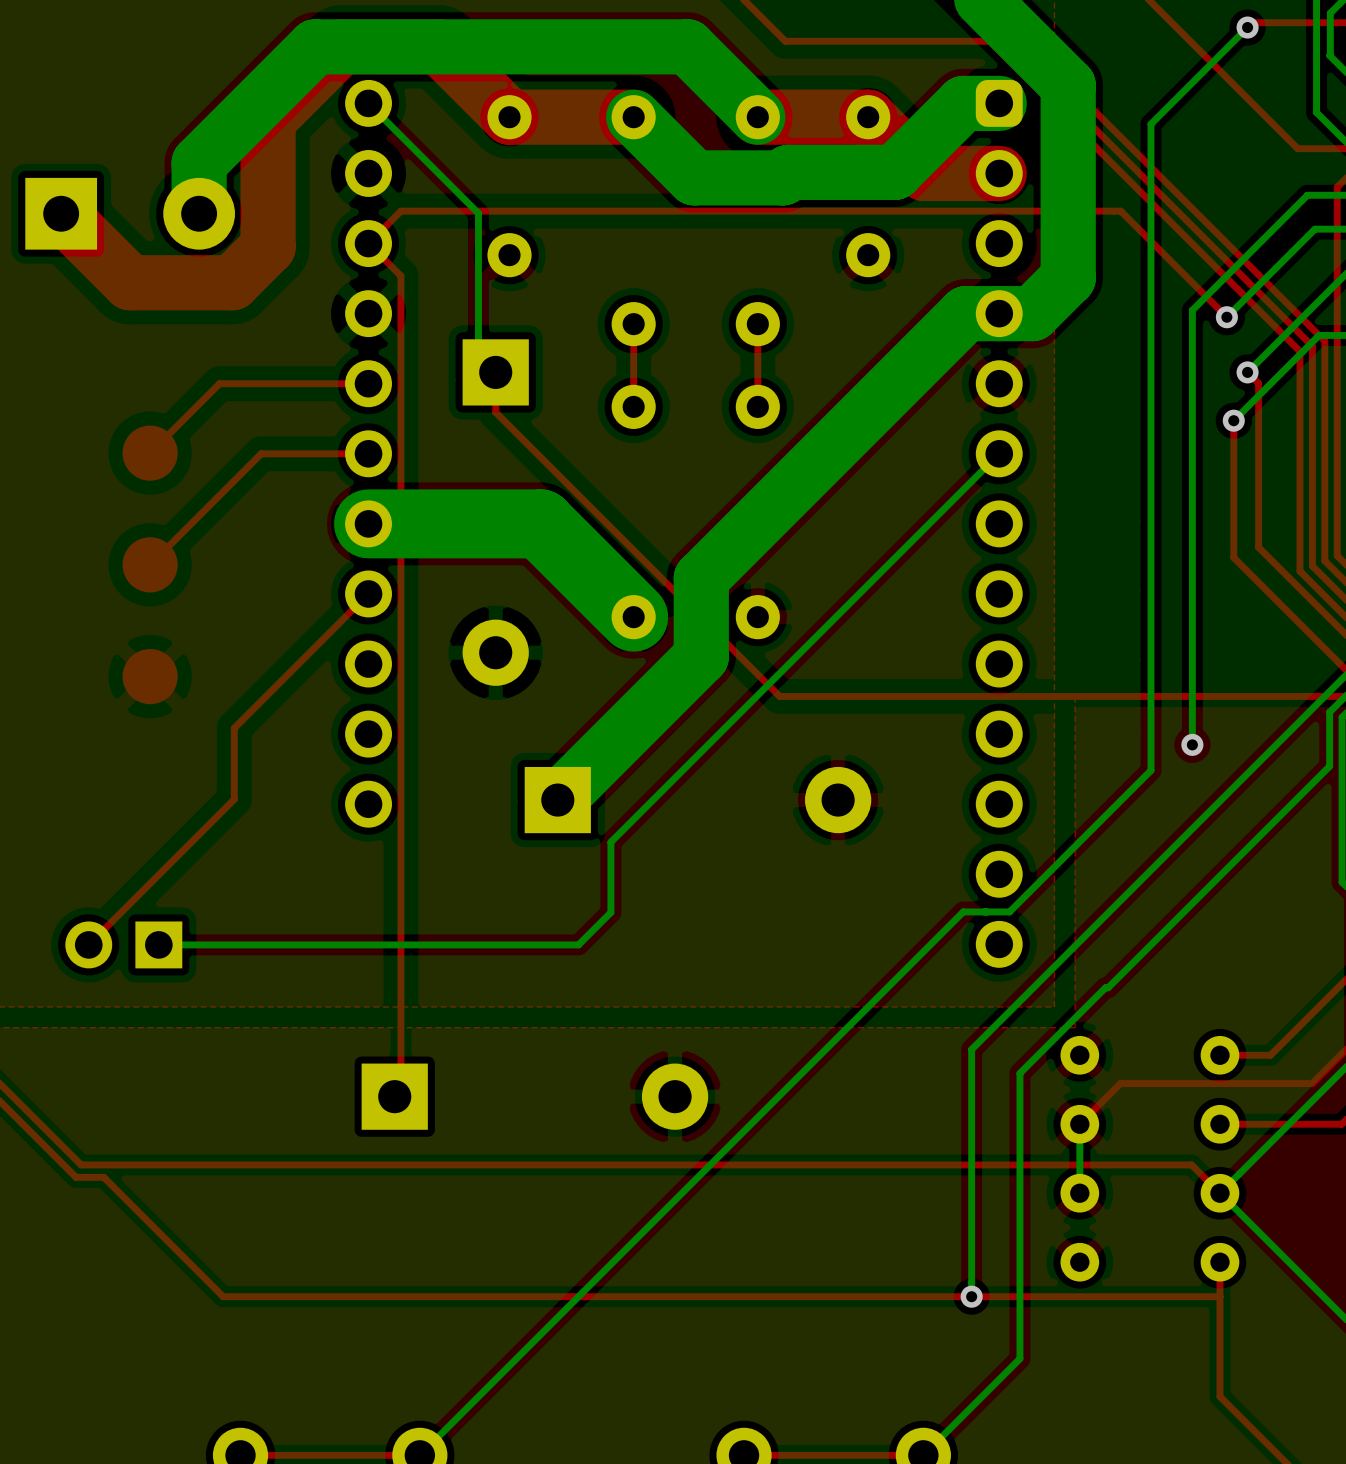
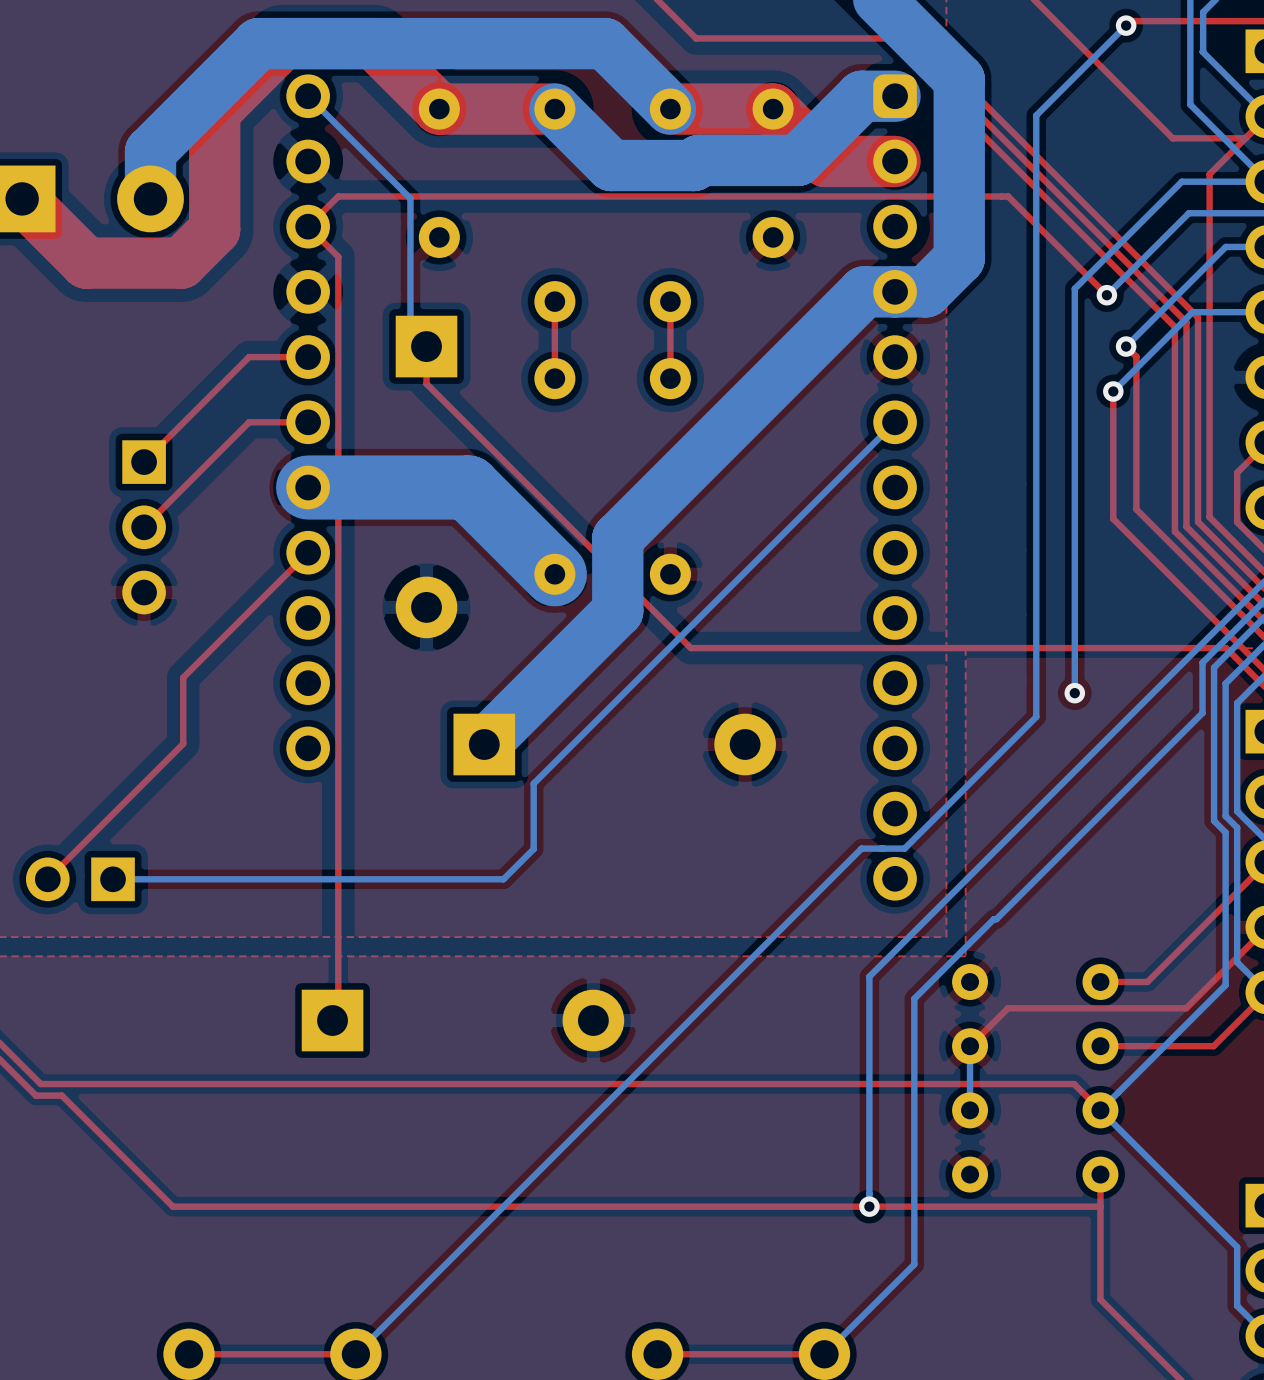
top track: (305, 383) (219, 383) (150, 453) -> (249, 357) (144, 462)
part: (150, 453) -> none
top track: (305, 453) (261, 453) (150, 564) -> (249, 422) (144, 527)
part: (150, 564) -> none
part: none -> (144, 527)
part: (150, 676) -> none

